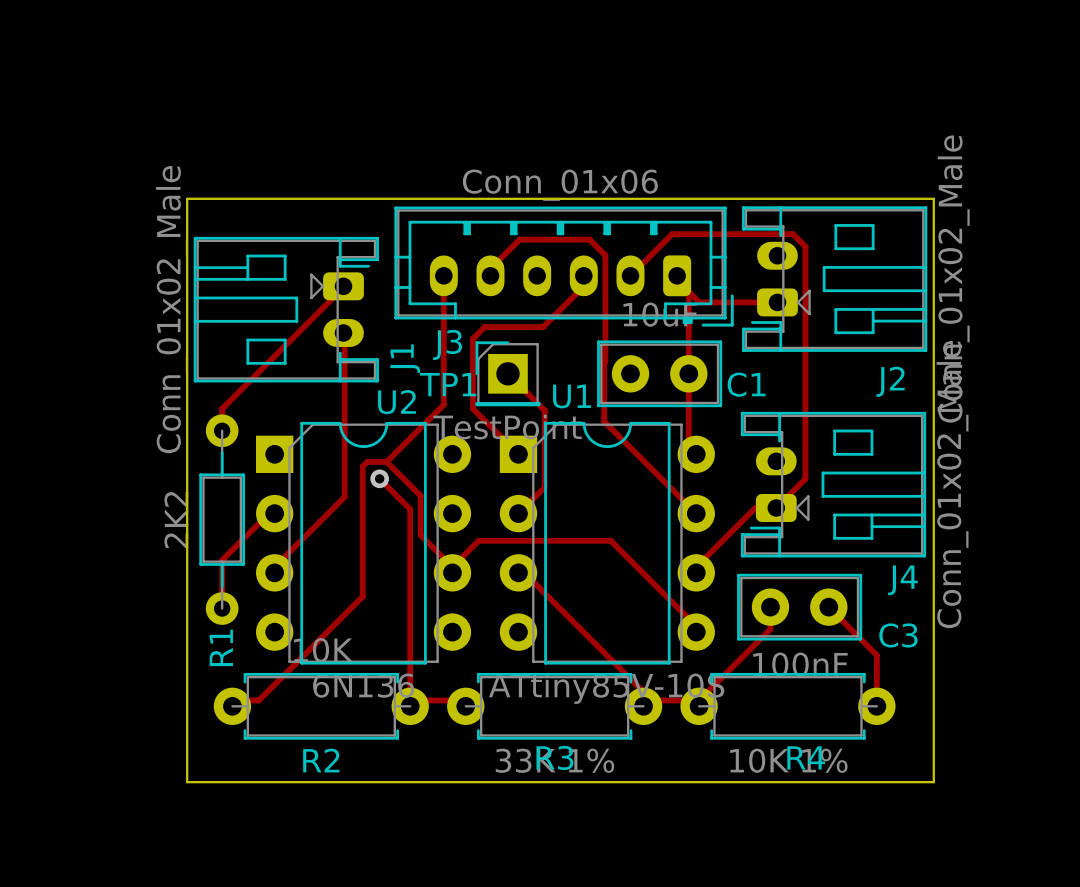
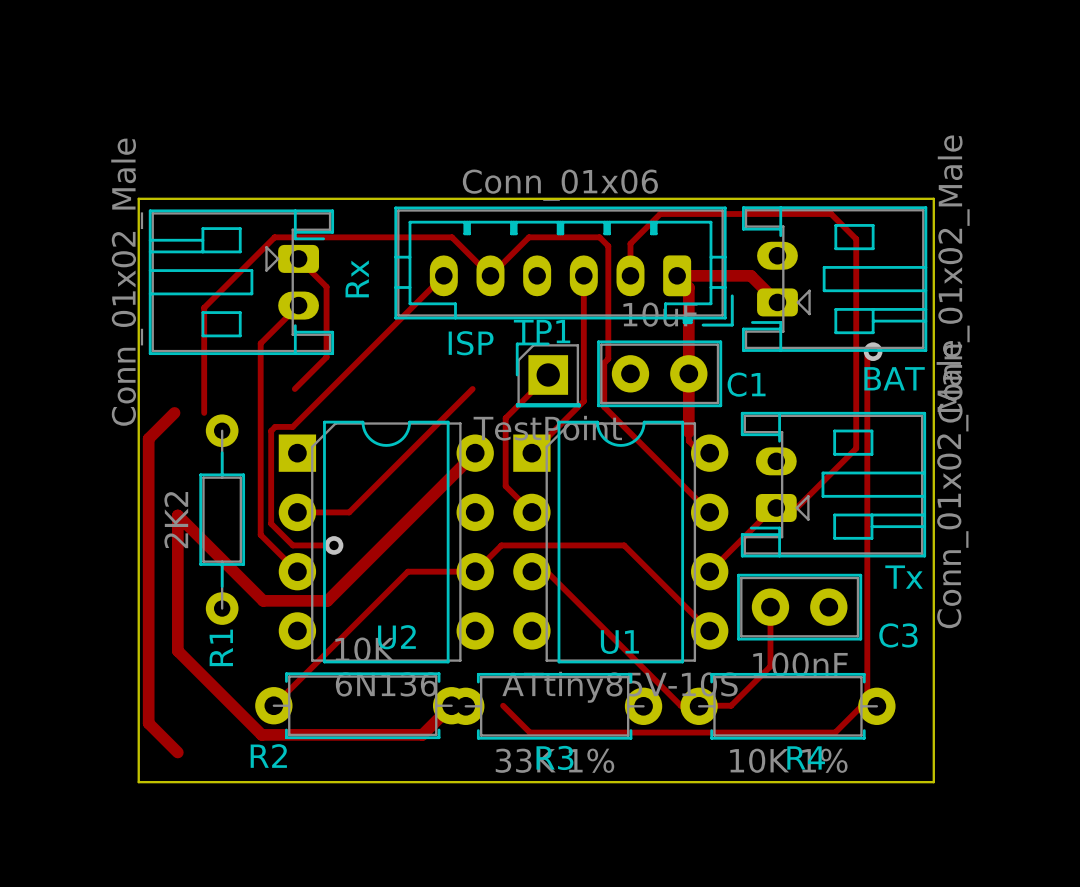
board edge: (187, 198) (187, 782) -> (187, 198) (138, 198) (138, 782) (187, 782)
track: none -> (298, 258) (326, 286) (326, 357) (294, 388)
track: (443, 275) (443, 404) (386, 461) -> (443, 275) (292, 426) (275, 426) (271, 430) (271, 523) (292, 545) (334, 545)
track: (490, 275) (490, 268) (519, 239) (589, 239) (605, 255) (605, 361) -> (204, 412) (204, 307) (274, 237) (452, 237) (490, 275) (528, 237) (599, 237) (608, 246) (608, 358) (605, 361)
track: (630, 275) (672, 234) (793, 234) (805, 246) (805, 478) (776, 507) (755, 507) (696, 567) -> (630, 275) (630, 243) (660, 214) (831, 214) (856, 239) (856, 448) (797, 507) (773, 507) (709, 571)
track: (677, 280) (699, 302) (776, 302) -> none
Rx: none -> Conn_01x02_Male (241, 282)
track: (344, 286) (222, 408) (222, 430) -> none
track: (583, 286) (542, 327) (484, 327) (472, 338) (472, 408) (518, 454) -> (583, 286) (583, 401) (531, 453)
track: none -> (688, 291) (688, 287) (677, 275) (750, 275) (777, 302)
track width: thin (688, 291) (688, 432) -> thick (688, 291) (688, 432)
track: none -> (298, 305) (260, 343) (260, 534) (297, 571)
J1: Conn_01x02_Male (286, 309) -> none
track: (344, 332) (344, 497) (274, 567) -> none
J3 name: J3 (447, 344) -> ISP (471, 343)
track: none -> (873, 351) (867, 351) (867, 700) (835, 732) (529, 732) (503, 705)
via: none -> (873, 351)
track: (507, 373) (544, 410) (544, 487) (518, 513) -> none
TP1 position: (507, 373) -> (548, 374)
track: none -> (548, 374) (505, 418) (505, 486) (531, 512)
J2 name: J2 (890, 381) -> BAT (894, 378)
TP1 name position: TP1 (448, 384) -> TP1 (542, 331)
track: none -> (472, 388) (349, 512) (297, 512)
U1 name position: U1 (572, 396) -> U1 (619, 642)
U2 name position: U2 (396, 402) -> U2 (396, 637)
track: (604, 406) (604, 421) (696, 513) -> (604, 406) (709, 512)
track: none -> (174, 412) (148, 438) (148, 723) (177, 752)
track: none -> (475, 453) (327, 600) (263, 600) (177, 515) (177, 650) (261, 734) (422, 734) (451, 705)
track: (386, 461) (420, 495) (420, 535) (452, 567) (478, 540) (610, 540) (696, 626) -> none
track: (386, 461) (367, 461) (362, 466) (362, 596) (258, 700) (232, 700) -> none
track: (379, 478) (410, 509) (410, 700) (465, 700) -> none
via position: (379, 478) -> (334, 545)
track: (274, 507) (222, 560) (222, 608) -> none
U2 position: (363, 543) -> (386, 542)
U1 position: (607, 543) -> (620, 542)
track: (518, 567) (643, 692) (643, 700) (699, 700) (770, 629) -> (531, 571) (546, 571) (680, 705) (731, 705) (770, 666) (770, 629)
J4 name: J4 (902, 580) -> Tx (904, 577)
track: (828, 607) (876, 655) (876, 700) -> none
track: none -> (709, 630) (624, 545) (501, 545) (475, 571) (407, 571) (273, 705)
R2 position: (321, 706) -> (362, 705)
R2 name position: R2 (321, 760) -> R2 (268, 755)

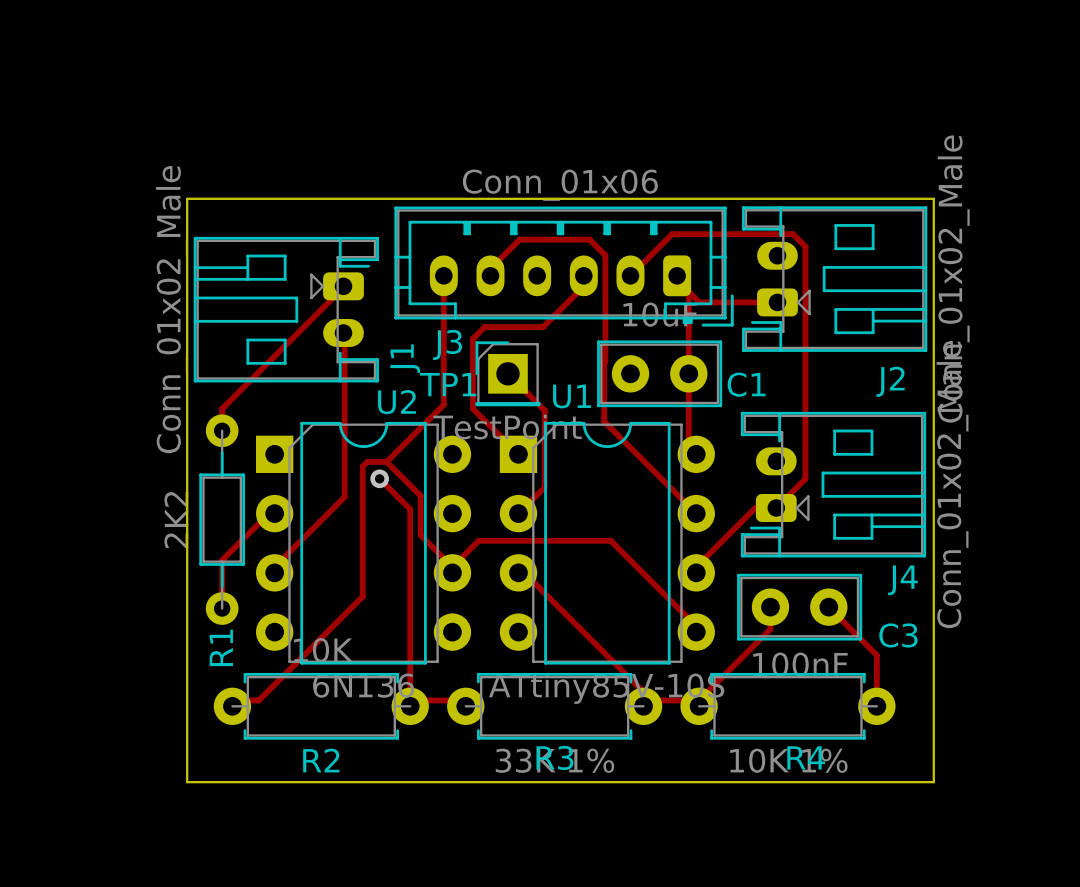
board edge: (187, 198) (138, 198) (138, 782) (187, 782) -> (187, 198) (187, 782)
track: (298, 258) (326, 286) (326, 357) (294, 388) -> none
track: (443, 275) (292, 426) (275, 426) (271, 430) (271, 523) (292, 545) (334, 545) -> (443, 275) (443, 404) (386, 461)
track: (630, 275) (630, 243) (660, 214) (831, 214) (856, 239) (856, 448) (797, 507) (773, 507) (709, 571) -> (630, 275) (672, 234) (793, 234) (805, 246) (805, 478) (776, 507) (755, 507) (696, 567)
track: none -> (677, 280) (699, 302) (776, 302)
Rx: Conn_01x02_Male (241, 282) -> none
track: none -> (344, 286) (222, 408) (222, 430)
track: (583, 286) (583, 401) (531, 453) -> (583, 286) (542, 327) (484, 327) (472, 338) (472, 408) (518, 454)
track: (688, 291) (688, 287) (677, 275) (750, 275) (777, 302) -> none
track width: thick (688, 291) (688, 432) -> thin (688, 291) (688, 432)
track: (298, 305) (260, 343) (260, 534) (297, 571) -> none
J1: none -> Conn_01x02_Male (286, 309)
TP1 name position: TP1 (542, 331) -> TP1 (448, 384)
track: none -> (344, 332) (344, 497) (274, 567)
ISP name: ISP (471, 343) -> J3 (447, 344)
track: (873, 351) (867, 351) (867, 700) (835, 732) (529, 732) (503, 705) -> none
via: (873, 351) -> none
track: (605, 361) (608, 358) (608, 246) (599, 237) (528, 237) (490, 275) (452, 237) (274, 237) (204, 307) (204, 412) -> (605, 361) (605, 255) (589, 239) (519, 239) (490, 268) (490, 275)
track: none -> (507, 373) (544, 410) (544, 487) (518, 513)
track: (548, 374) (505, 418) (505, 486) (531, 512) -> none
TP1 position: (548, 374) -> (507, 373)
BAT name: BAT (894, 378) -> J2 (890, 381)
track: (472, 388) (349, 512) (297, 512) -> none
track: (604, 406) (709, 512) -> (604, 406) (604, 421) (696, 513)
track: (174, 412) (148, 438) (148, 723) (177, 752) -> none
track: (475, 453) (327, 600) (263, 600) (177, 515) (177, 650) (261, 734) (422, 734) (451, 705) -> none
track: none -> (386, 461) (420, 495) (420, 535) (452, 567) (478, 540) (610, 540) (696, 626)
track: none -> (386, 461) (367, 461) (362, 466) (362, 596) (258, 700) (232, 700)
track: none -> (379, 478) (410, 509) (410, 700) (465, 700)
track: none -> (274, 507) (222, 560) (222, 608)
U2 position: (386, 542) -> (363, 543)
U1 position: (620, 542) -> (607, 543)
via position: (334, 545) -> (379, 478)
track: (531, 571) (546, 571) (680, 705) (731, 705) (770, 666) (770, 629) -> (518, 567) (643, 692) (643, 700) (699, 700) (770, 629)
Tx name: Tx (904, 577) -> J4 (902, 580)
track: none -> (828, 607) (876, 655) (876, 700)
track: (709, 630) (624, 545) (501, 545) (475, 571) (407, 571) (273, 705) -> none
U2 name position: U2 (396, 637) -> U2 (396, 402)
U1 name position: U1 (619, 642) -> U1 (572, 396)
R2 position: (362, 705) -> (321, 706)
R2 name position: R2 (268, 755) -> R2 (321, 760)

